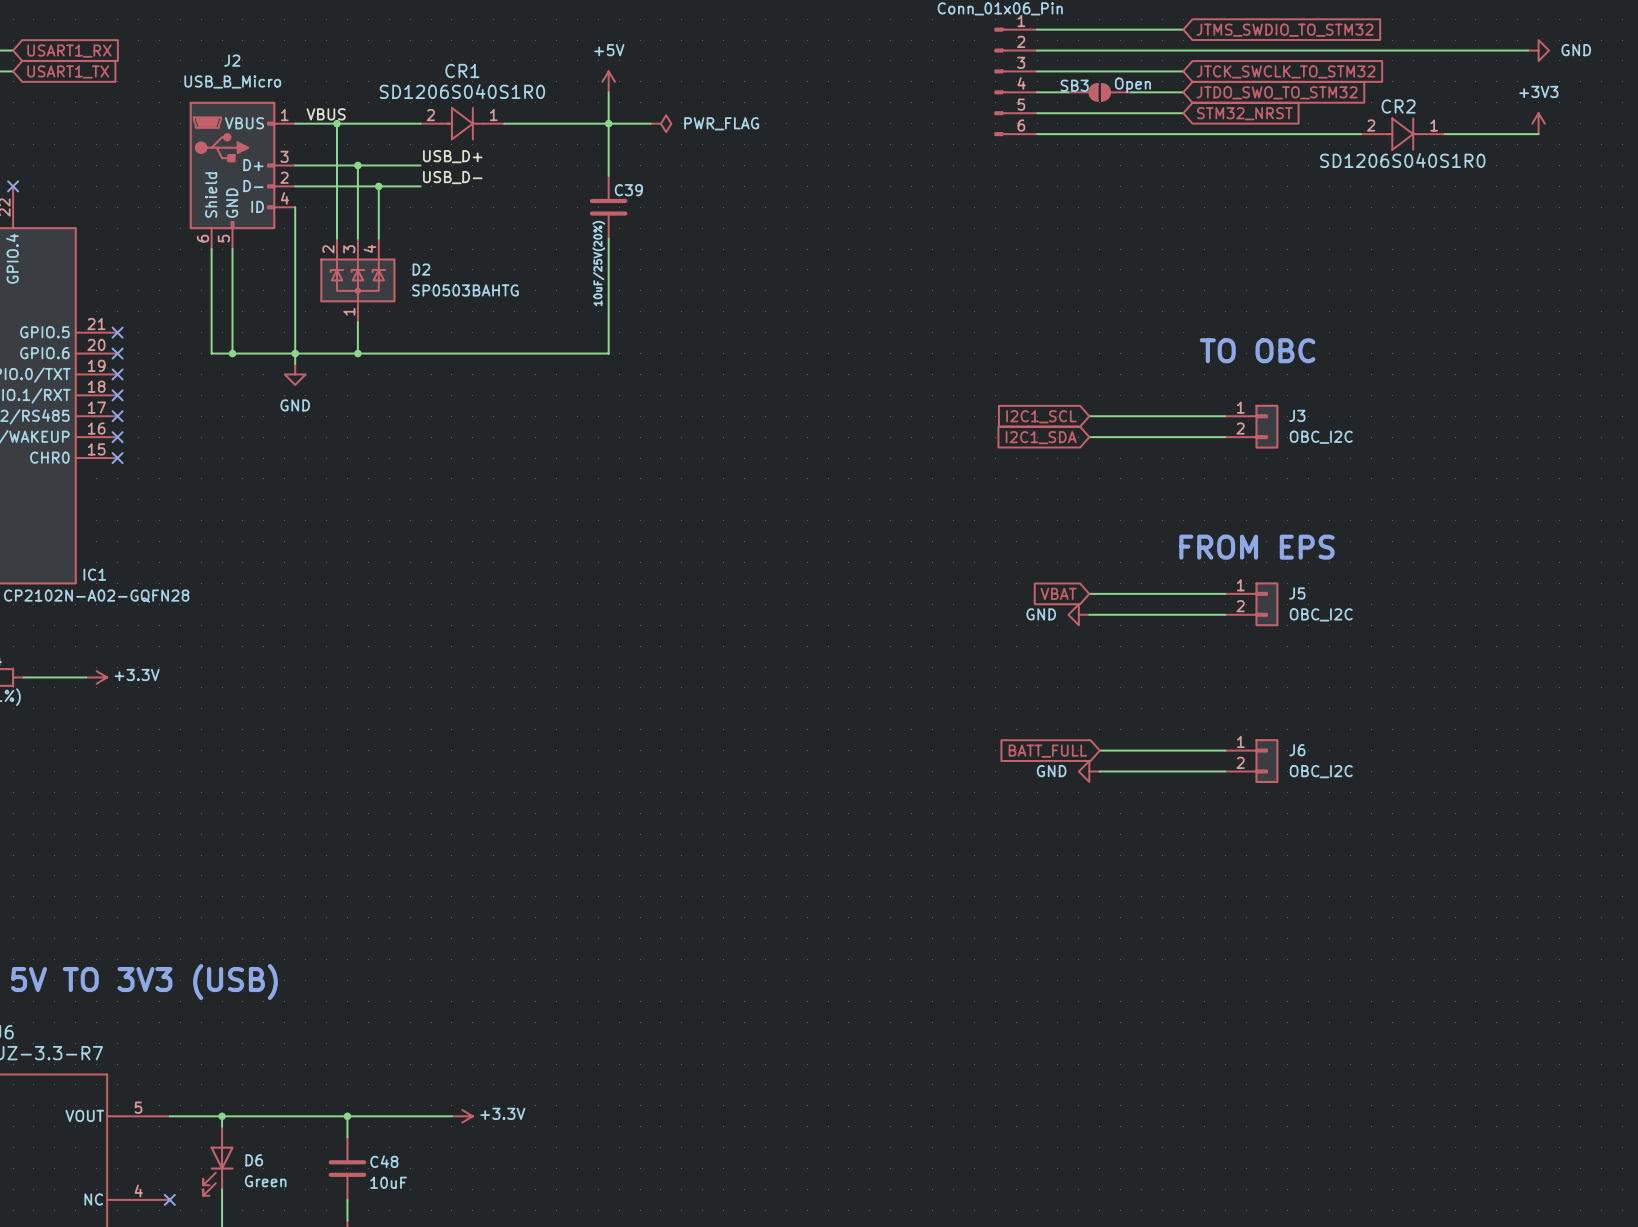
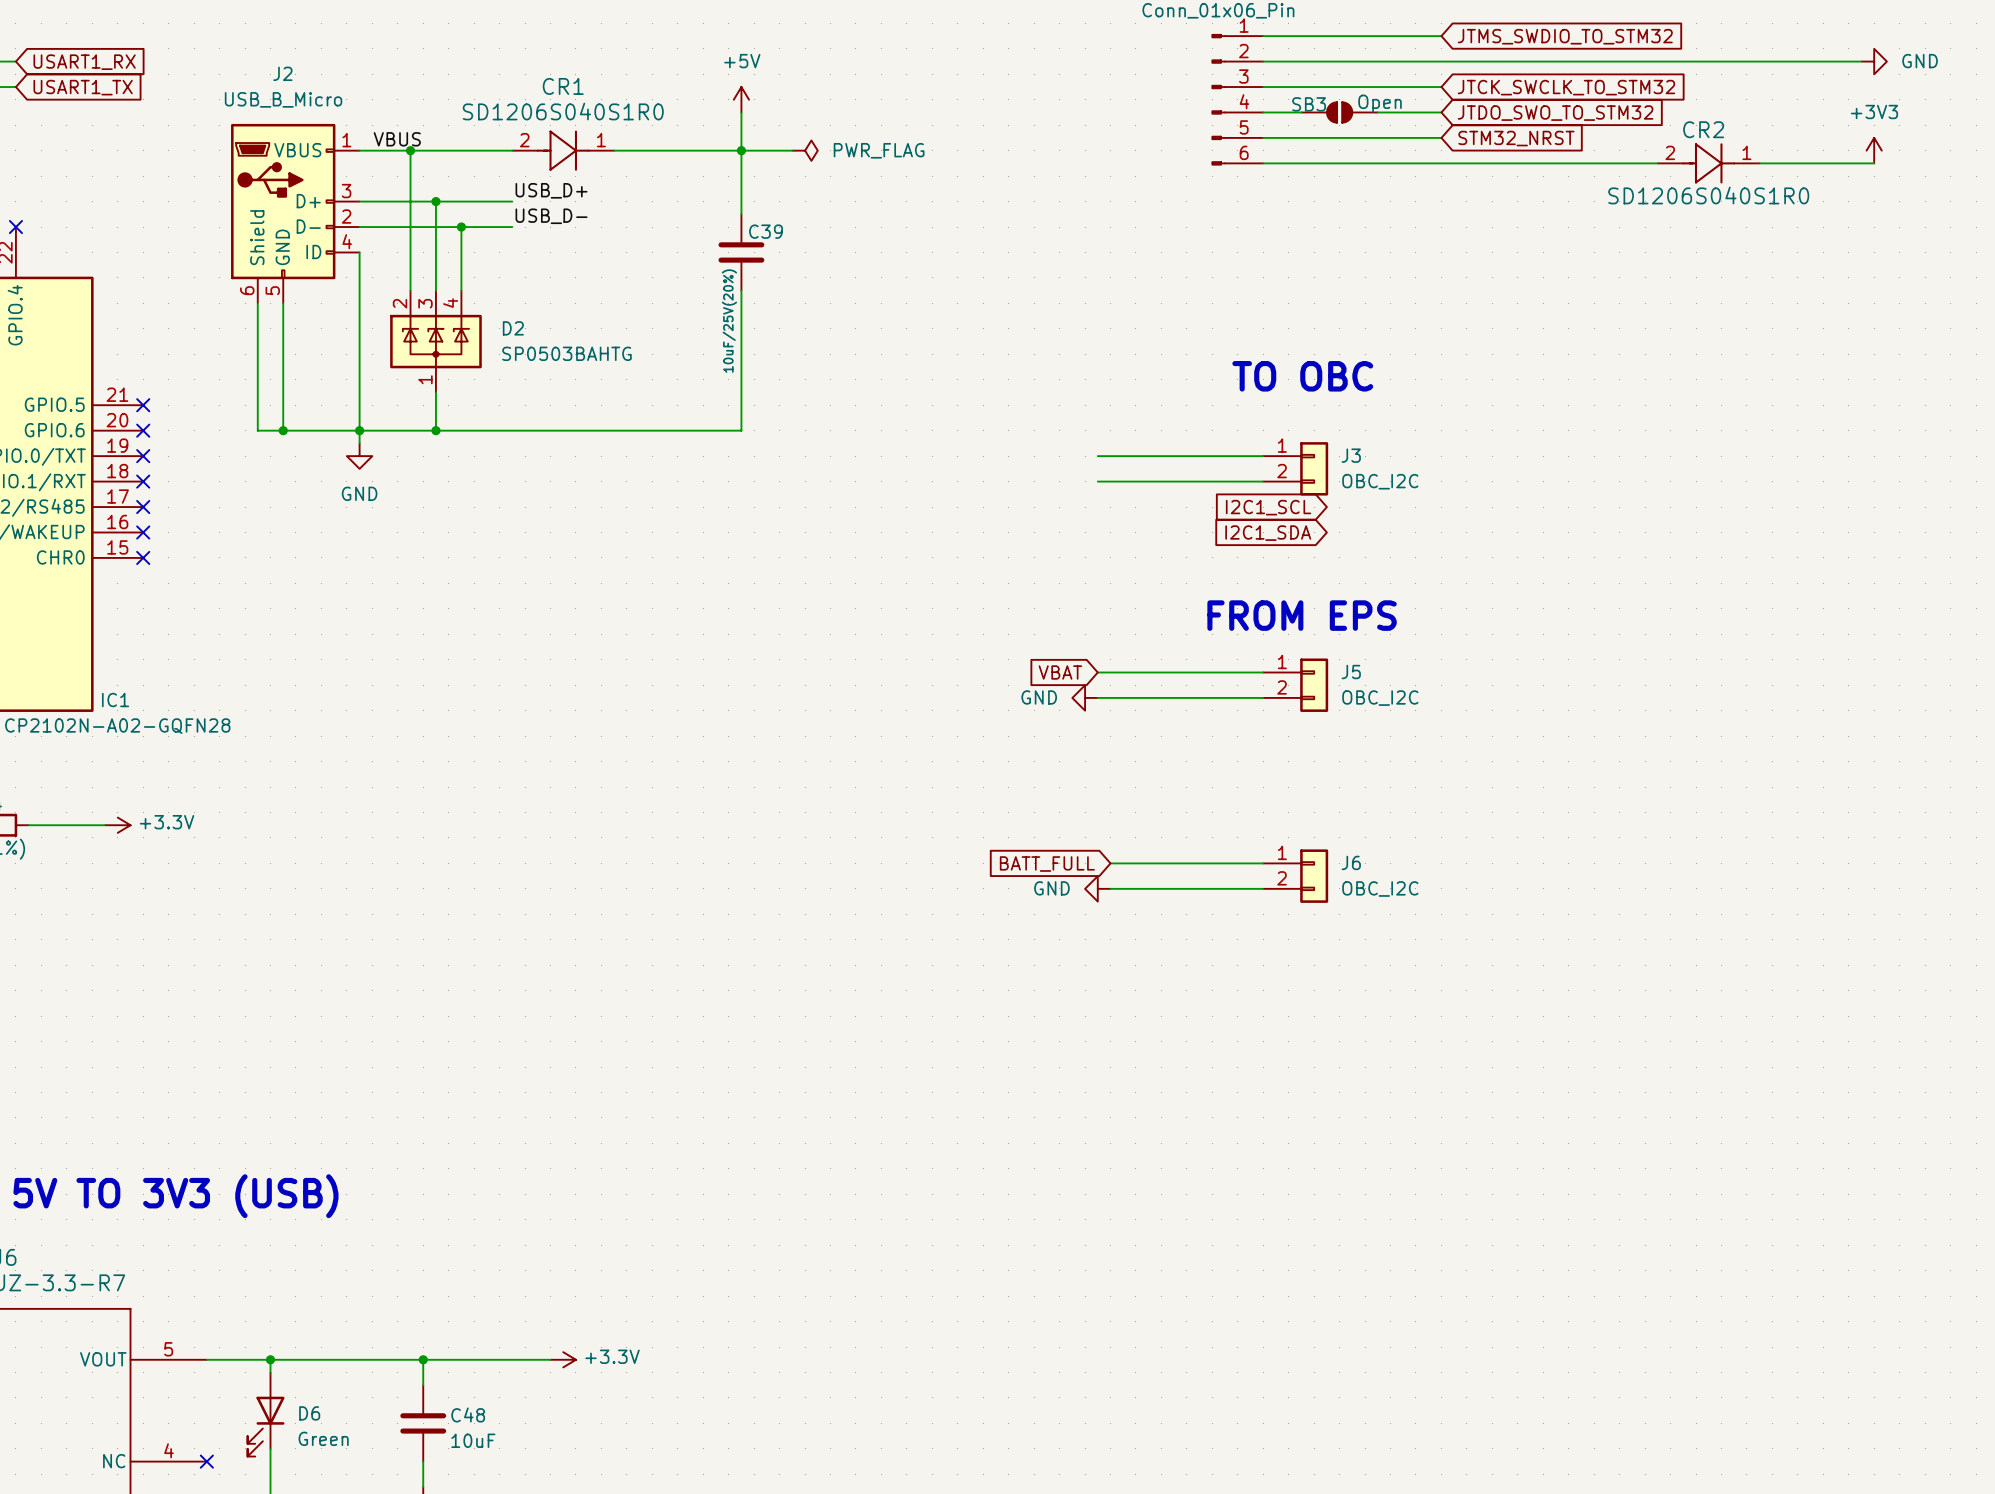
text position: TO OBC (1257, 350) -> TO OBC (1302, 376)
wire: (1089, 416) (1225, 416) -> (1097, 456) (1263, 456)
J3 position: (1251, 426) -> (1295, 468)
wire: (1089, 437) (1225, 437) -> (1097, 481) (1263, 481)
text position: FROM EPS (1256, 547) -> FROM EPS (1302, 615)
power symbol: none -> GND (1085, 697)
global label position: VBAT (1058, 593) -> VBAT (1060, 672)
wire: (1089, 593) (1225, 593) -> (1097, 672) (1263, 672)
J5 position: (1251, 604) -> (1295, 685)
power symbol: GND (1078, 614) -> none
wire: (1089, 614) (1225, 614) -> (1097, 697) (1263, 697)
power symbol: none -> GND (1097, 888)
wire: (1099, 750) (1225, 750) -> (1110, 863) (1263, 863)
global label position: BATT_FULL (1047, 751) -> BATT_FULL (1047, 864)
J6 position: (1251, 761) -> (1295, 876)
power symbol: GND (1089, 771) -> none
wire: (1099, 771) (1225, 771) -> (1110, 888) (1263, 888)

